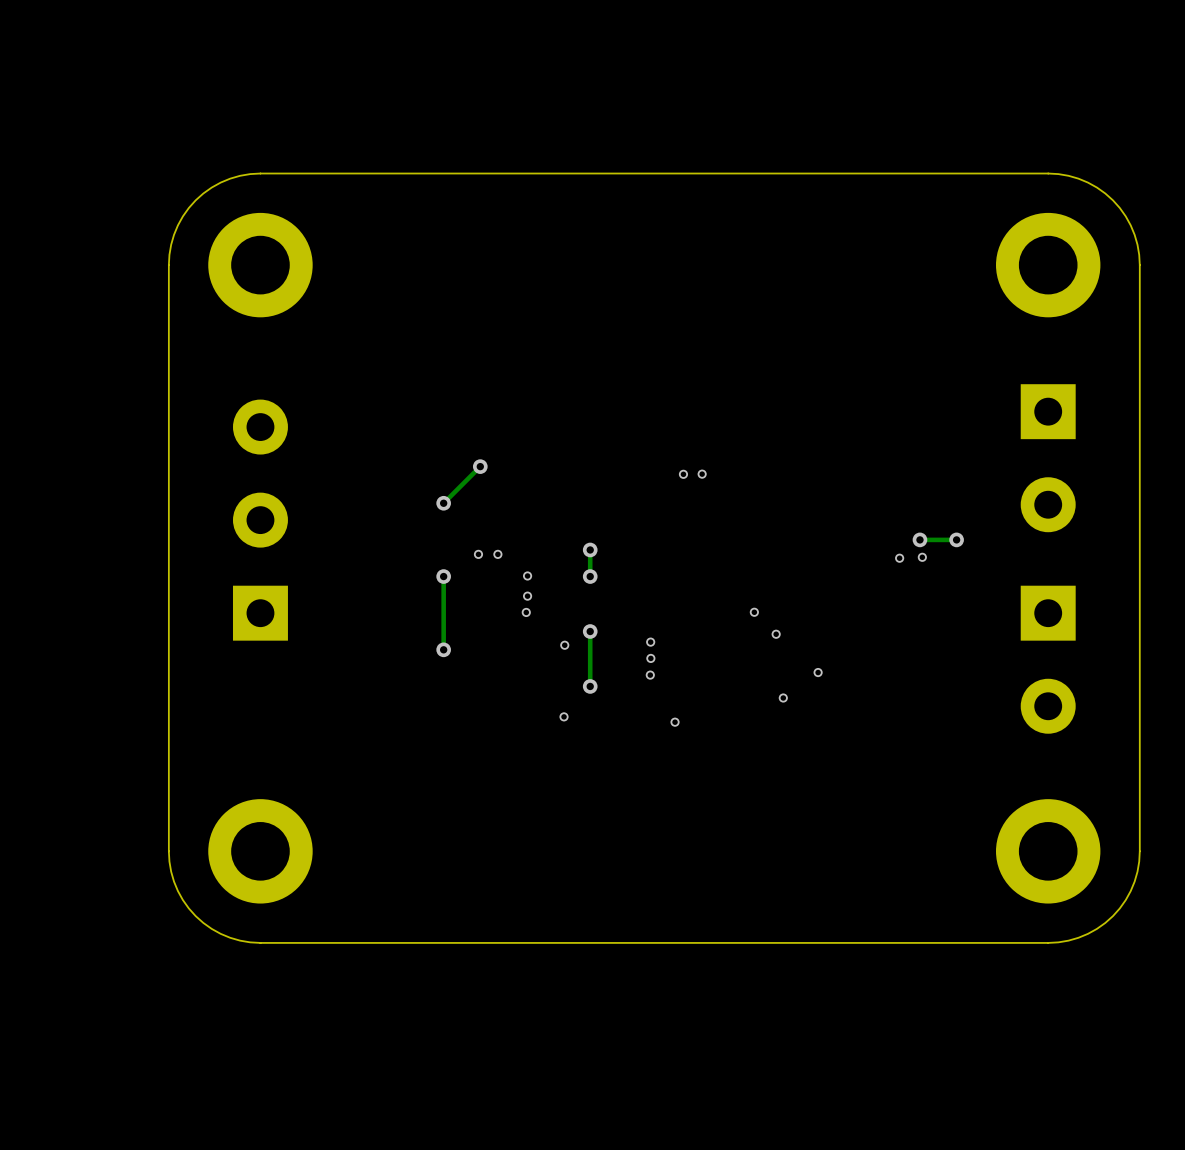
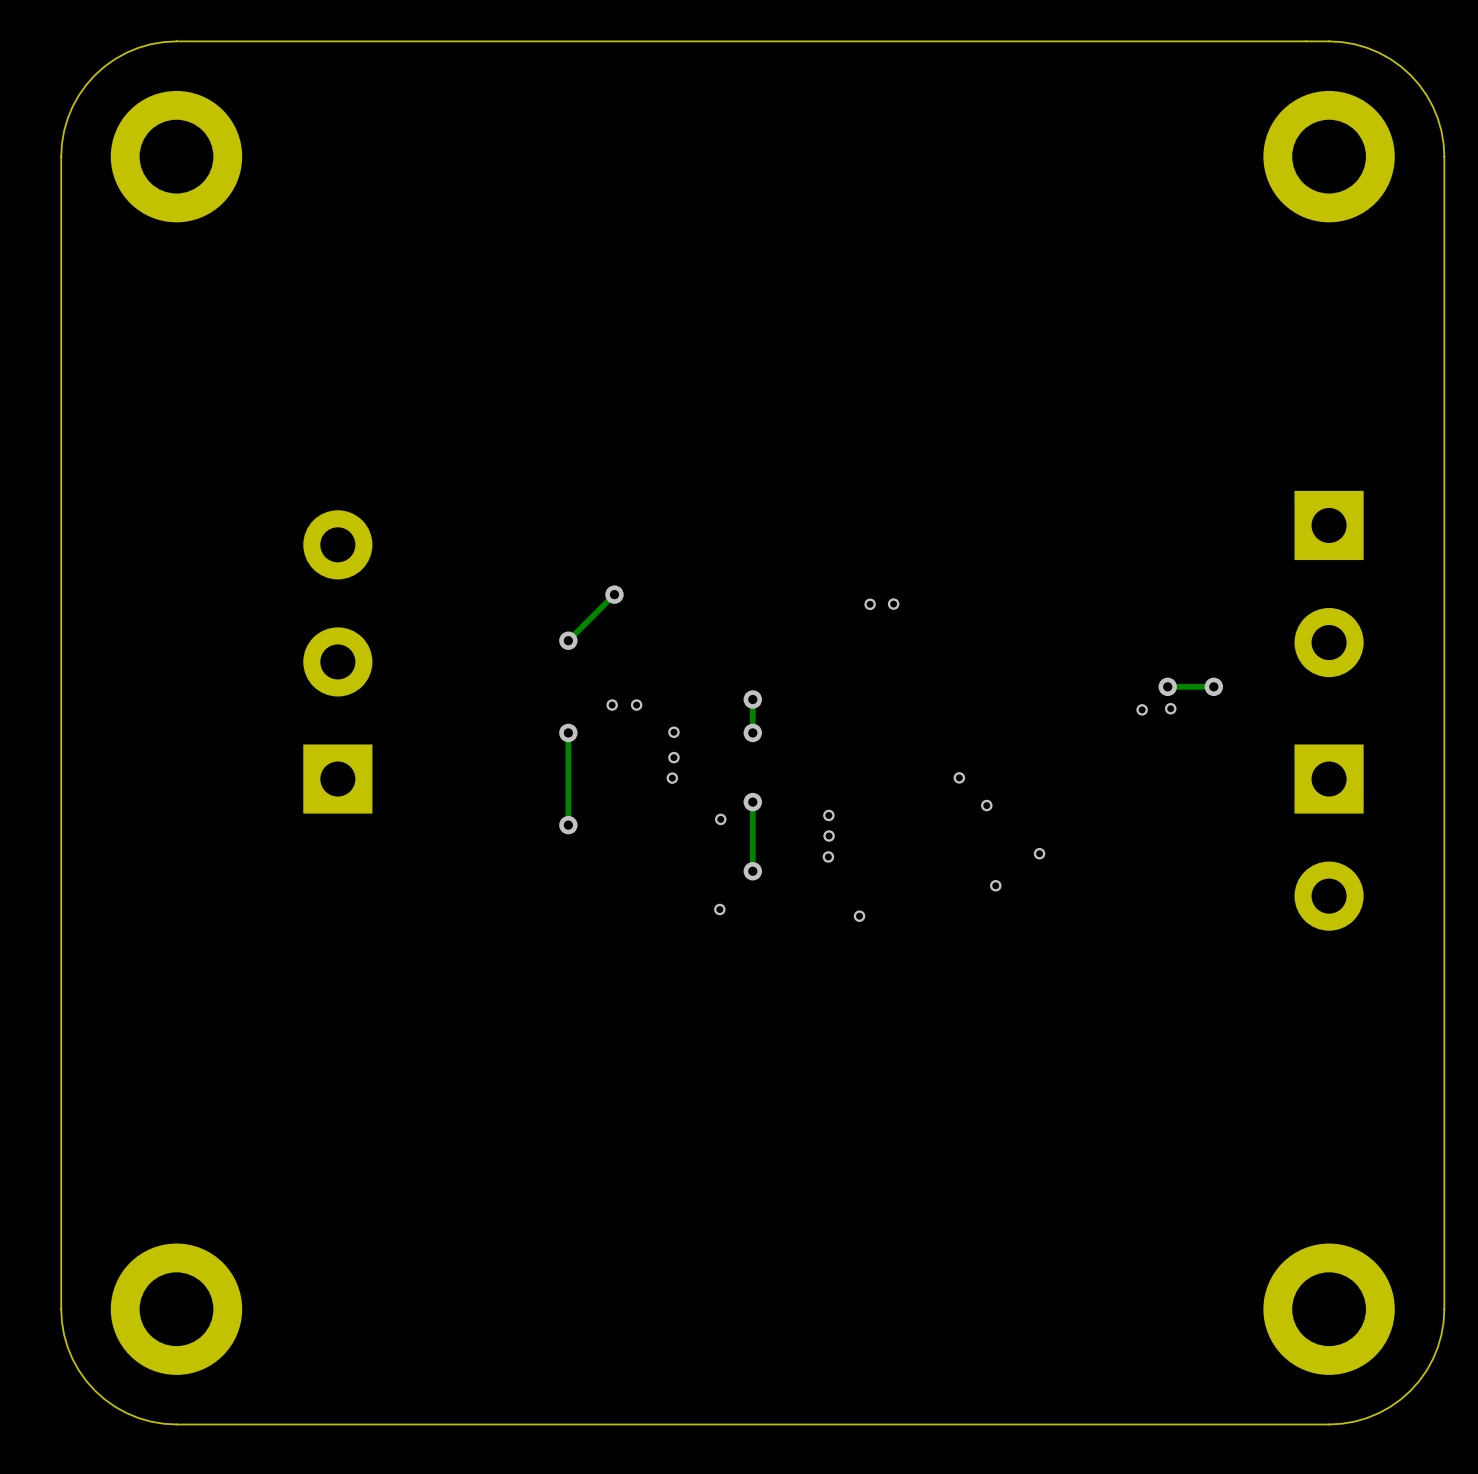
part position: (260, 265) -> (176, 156)
part position: (1048, 265) -> (1329, 156)
board edge: (1139, 265) (1137, 244) (1130, 225) (1112, 200) (1096, 187) (1078, 178) (1048, 173) (250, 174) (230, 178) (211, 187) (188, 208) (174, 234) (168, 265) (169, 861) (174, 881) (182, 900) (195, 916) (211, 928) (240, 940) (260, 942) (1058, 942) (1078, 937) (1096, 928) (1119, 908) (1134, 881) (1139, 851) -> (1444, 341) (1444, 156) (1437, 118) (1426, 95) (1410, 75) (1390, 59) (1354, 44) (1329, 41) (176, 41) (138, 47) (104, 66) (86, 84) (72, 106) (64, 130) (61, 156) (61, 1309) (64, 1334) (72, 1359) (94, 1390) (126, 1413) (163, 1423) (1329, 1424) (1354, 1421) (1390, 1406) (1410, 1390) (1432, 1359) (1441, 1334) (1444, 1309) (1444, 1078)
part position: (260, 851) -> (176, 1309)
part position: (1048, 851) -> (1329, 1309)

